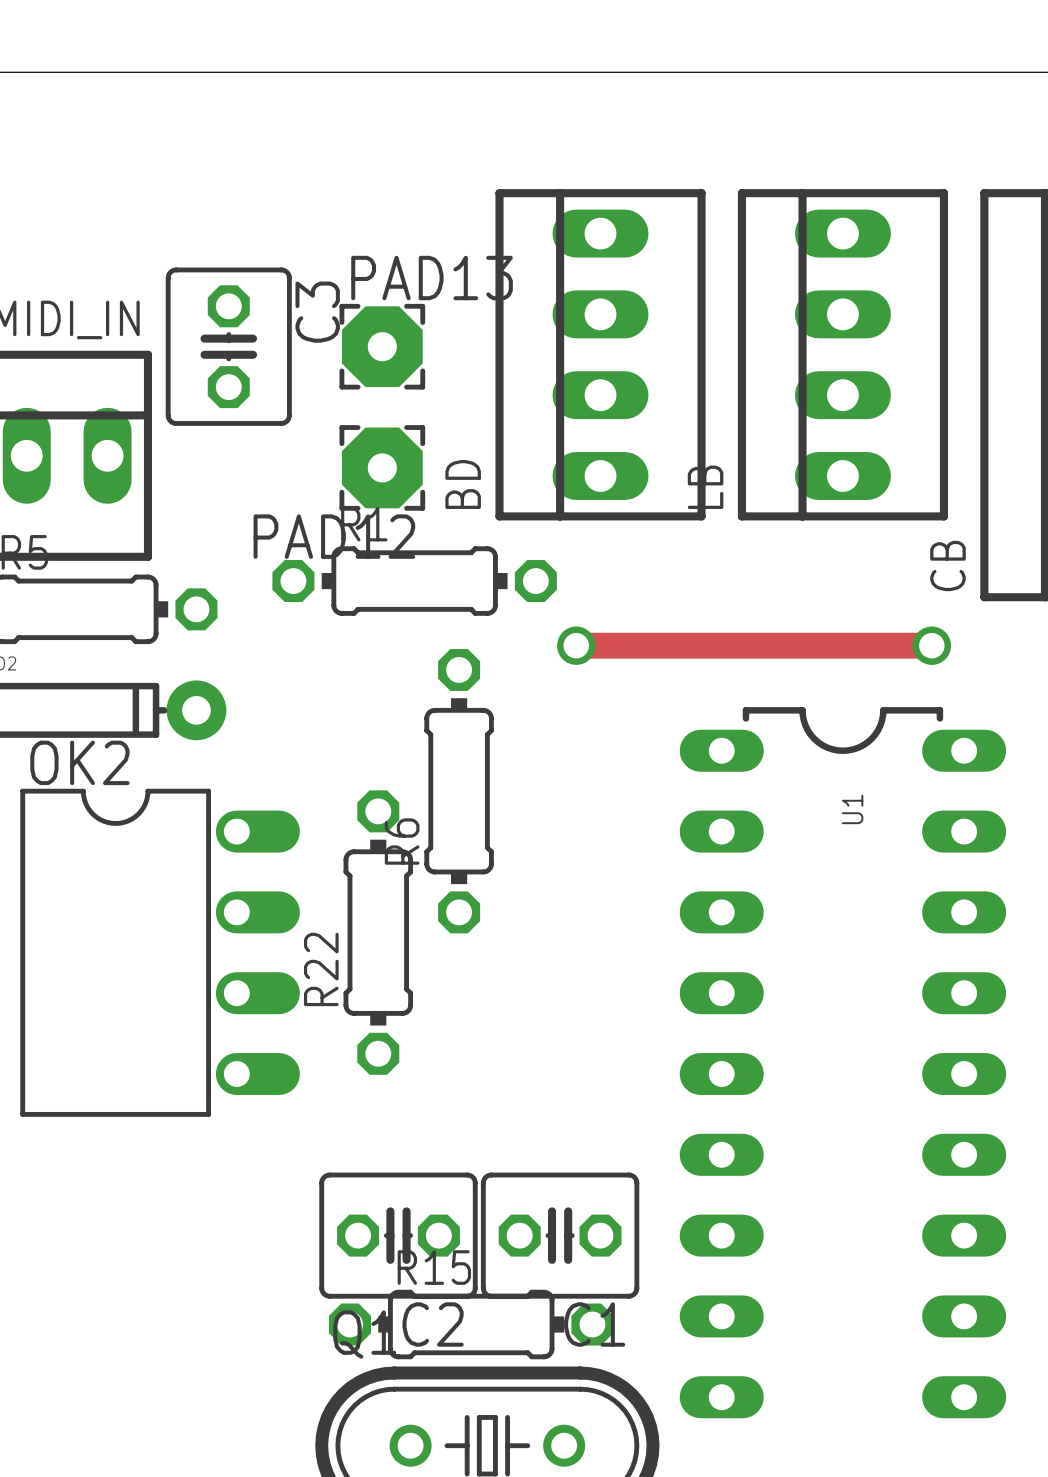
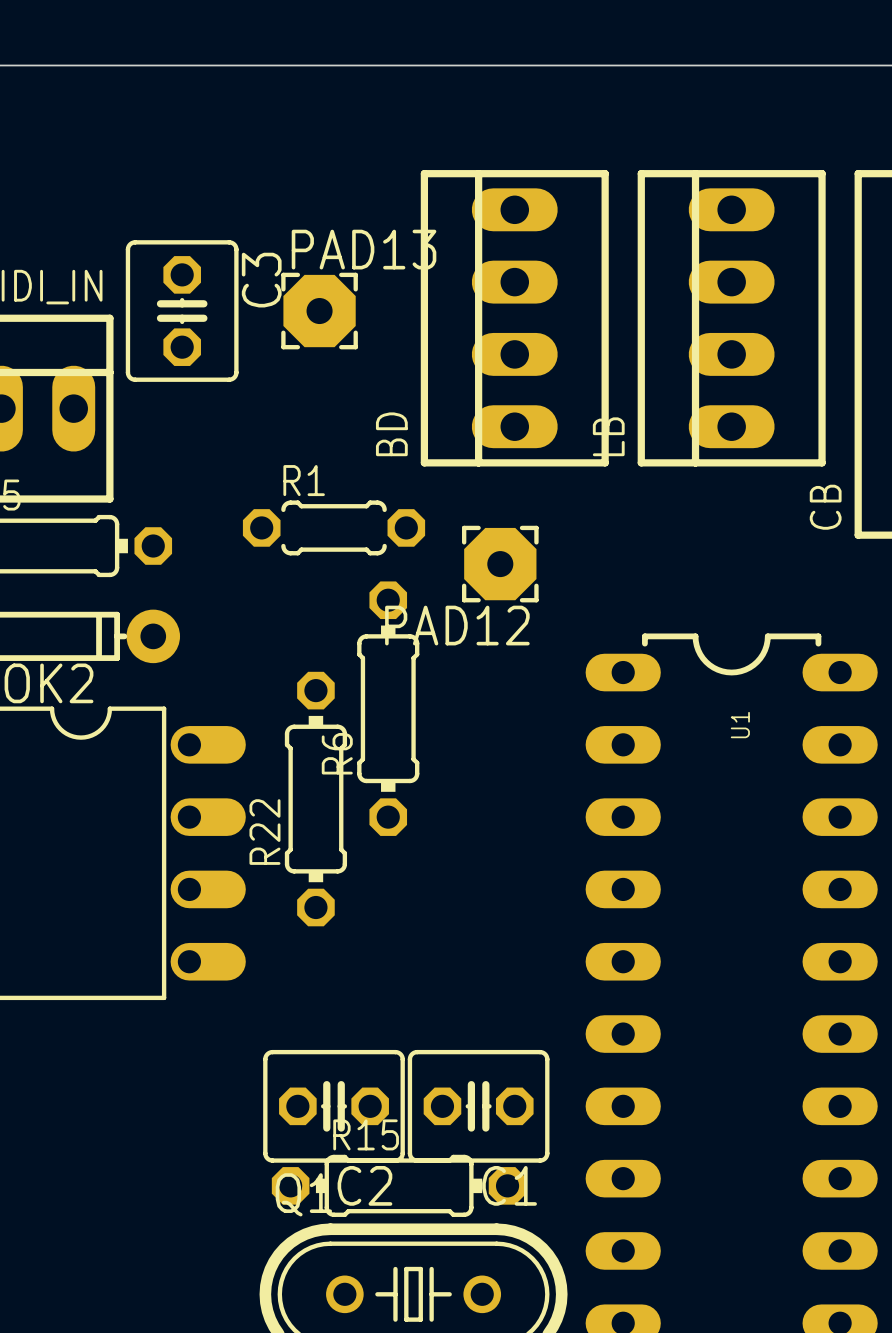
PAD12 position: (382, 467) -> (500, 564)
R1 footprint: [272, 546, 557, 616] -> [242, 500, 426, 556]
track: (576, 645) (931, 645) -> none
via: (576, 645) -> none
via: (931, 645) -> none
R22 position: (378, 932) -> (315, 799)

